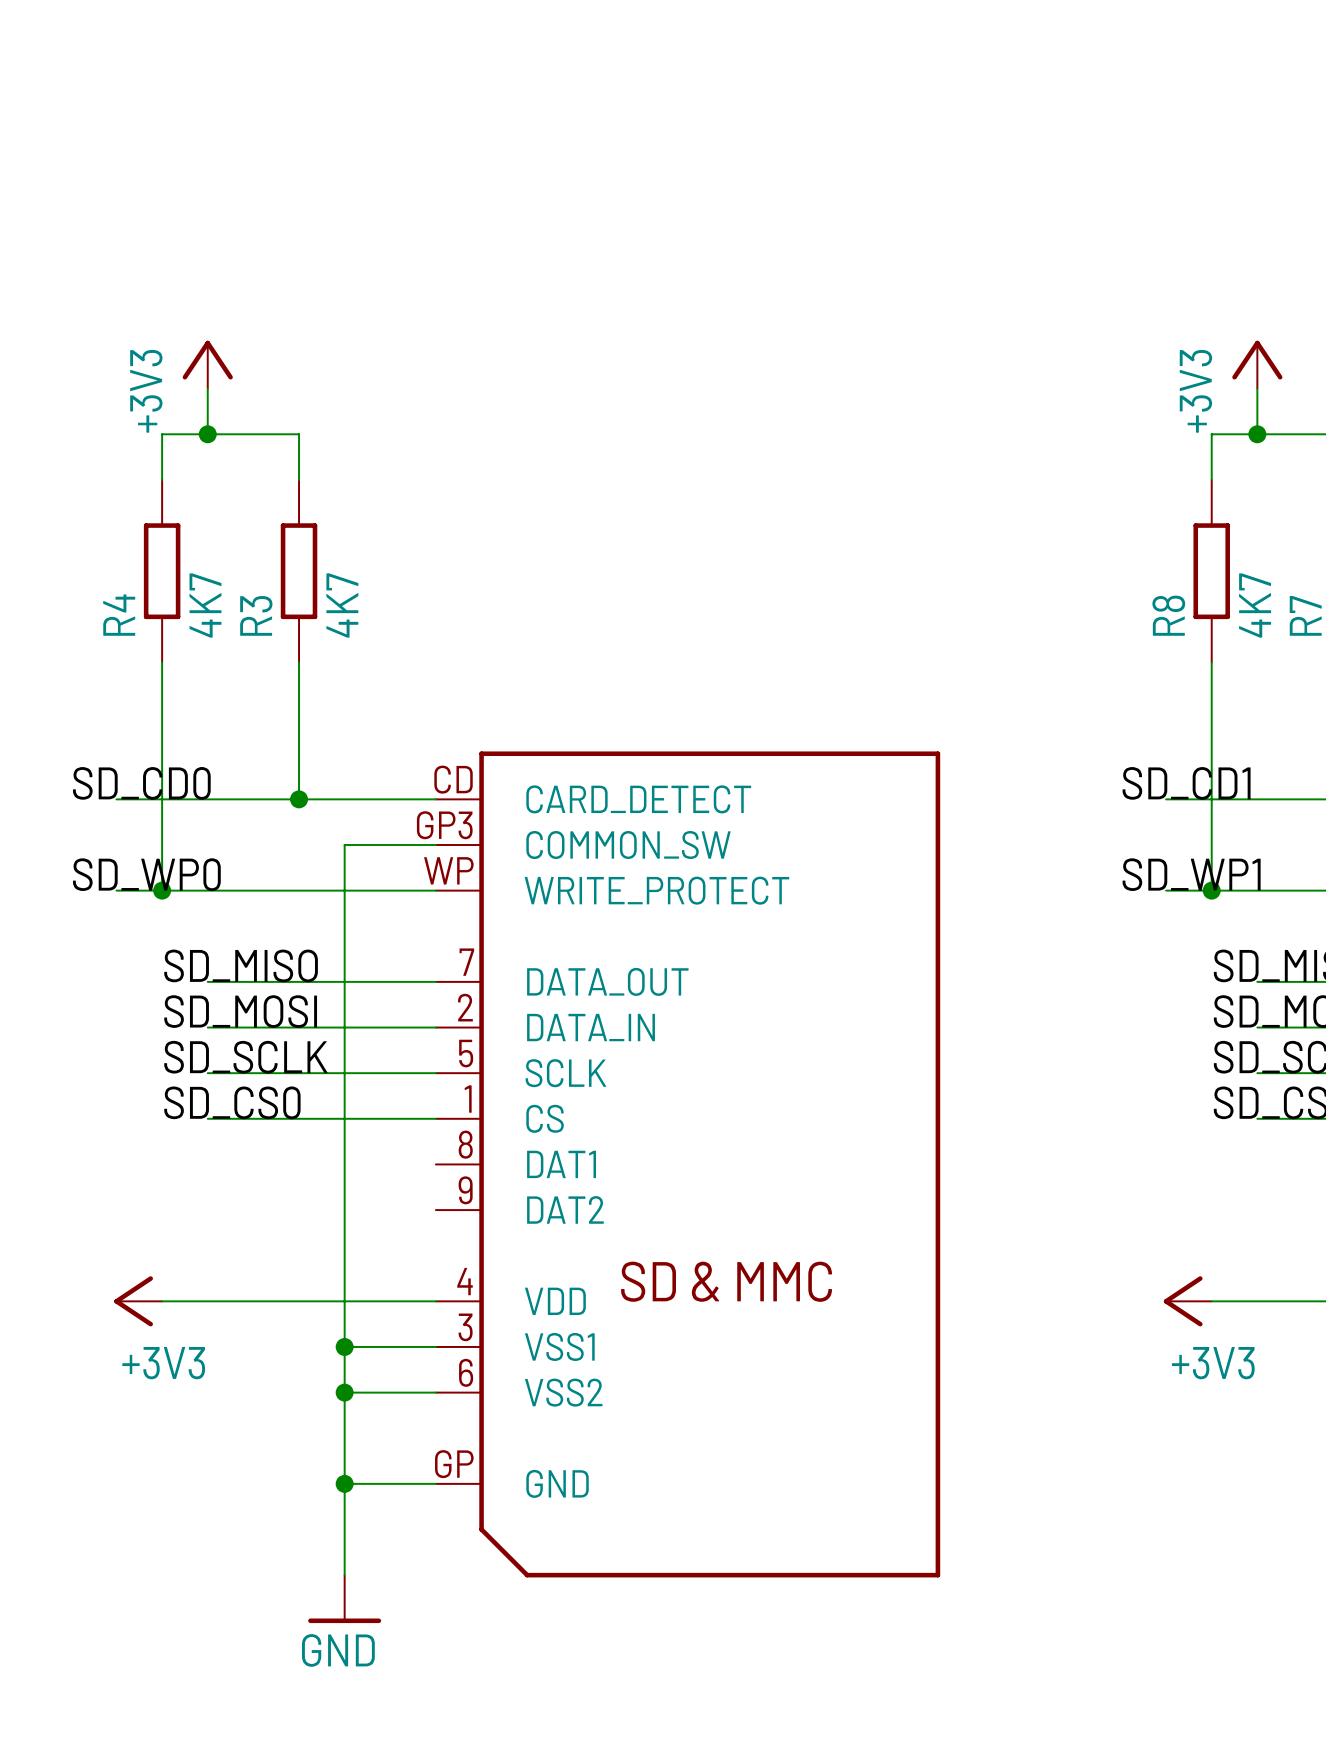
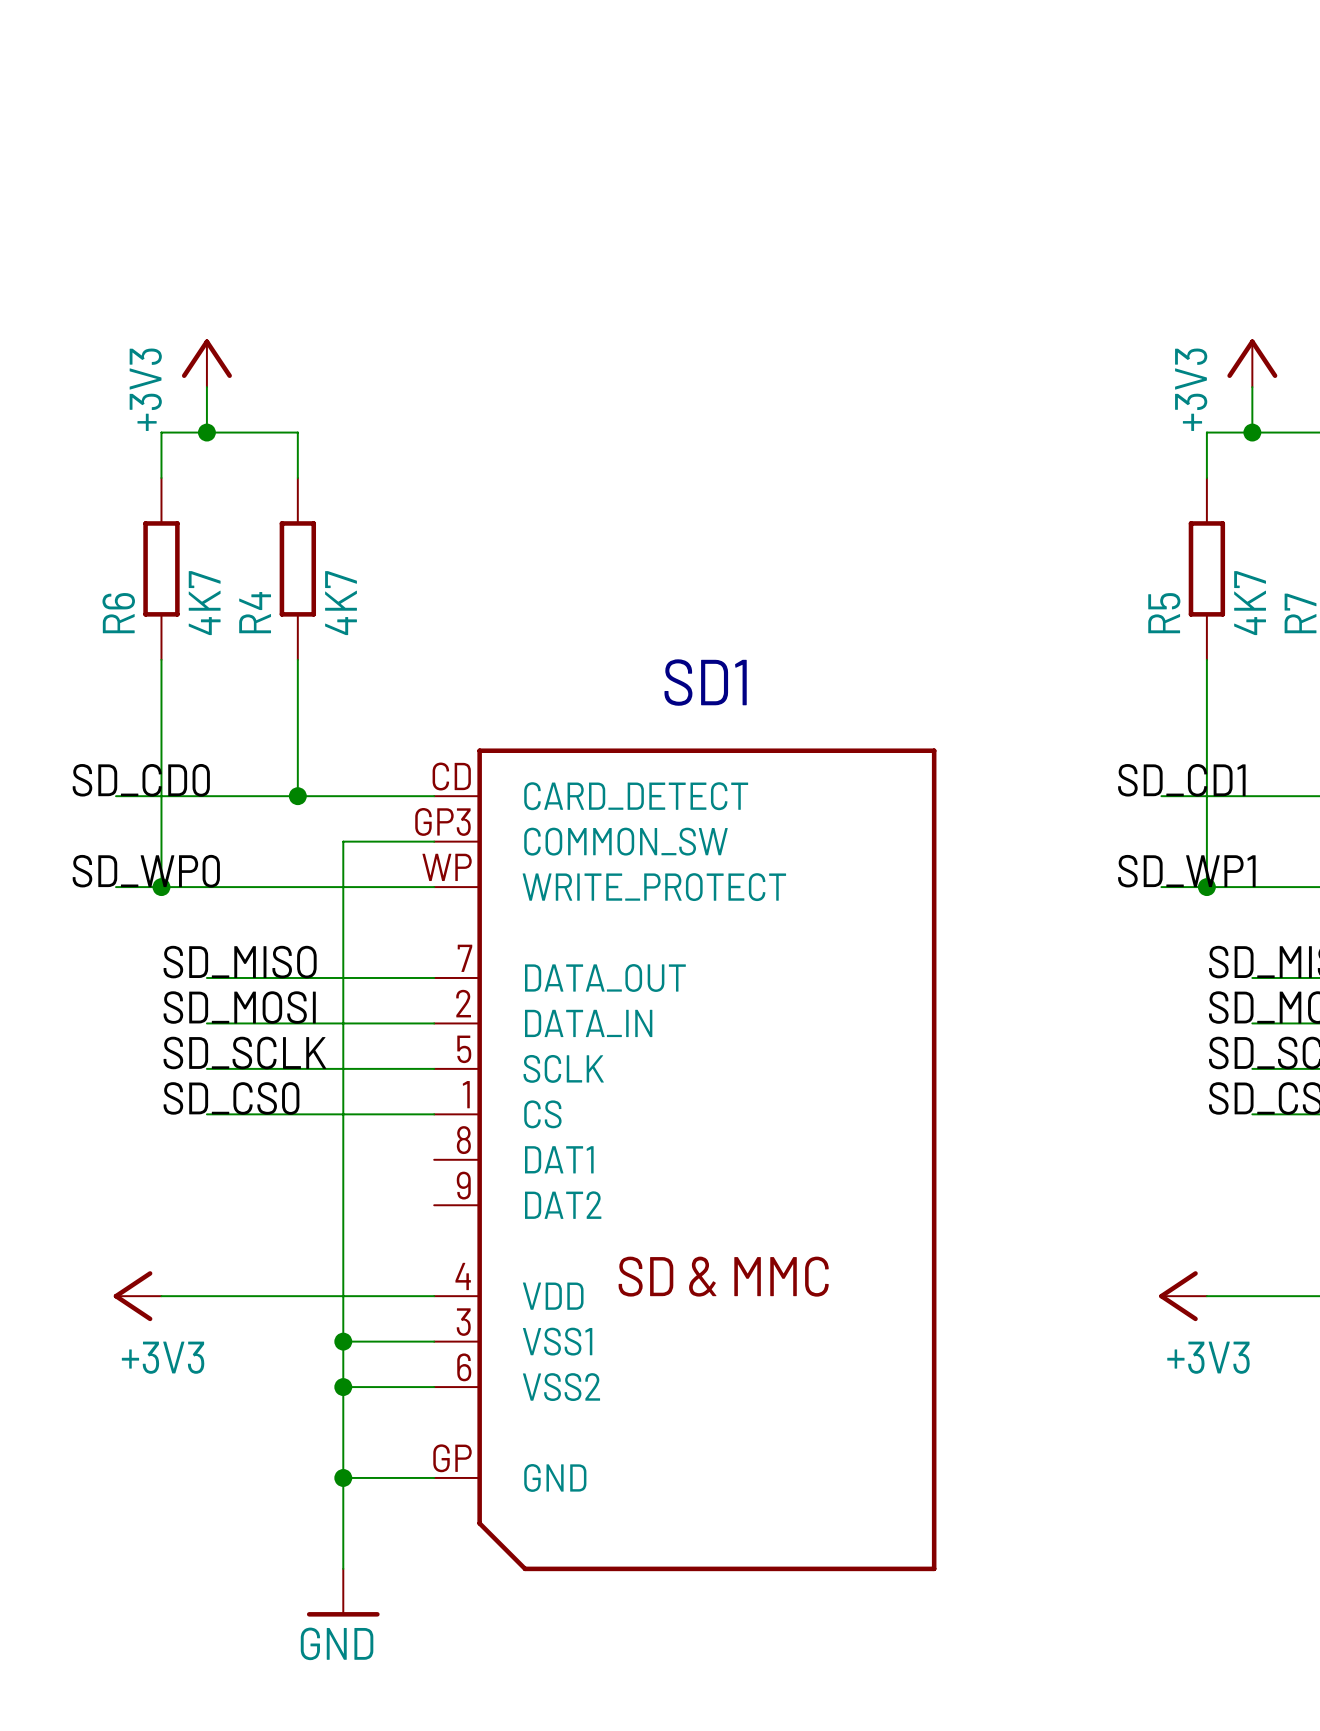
R4 name: R4 (119, 615) -> R6 (118, 613)
R3 name: R3 (256, 615) -> R4 (255, 612)
R8 name: R8 (1168, 615) -> R5 (1164, 613)
text: none -> SD1 (705, 682)

